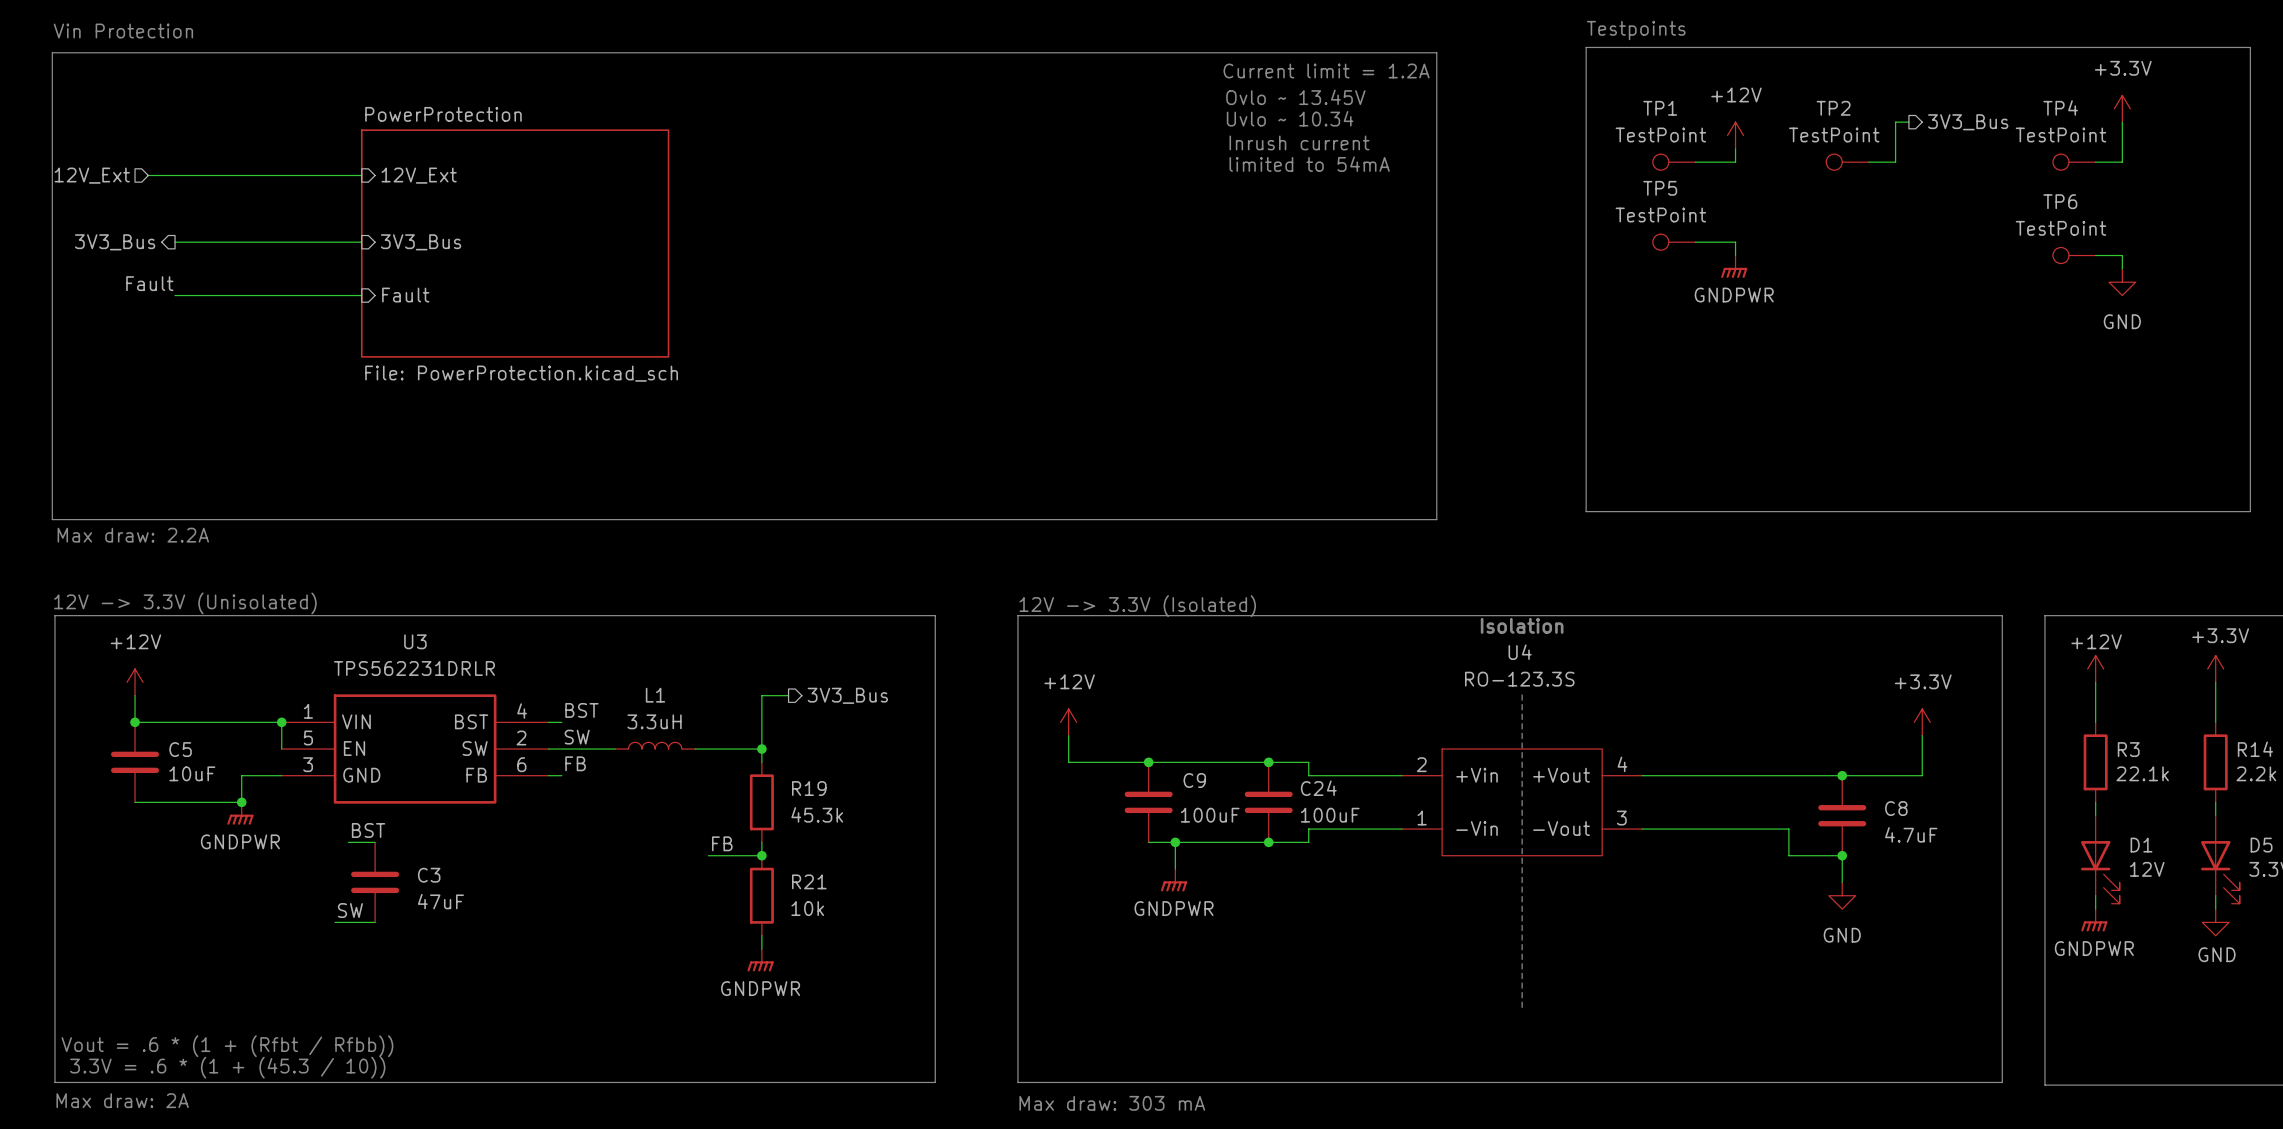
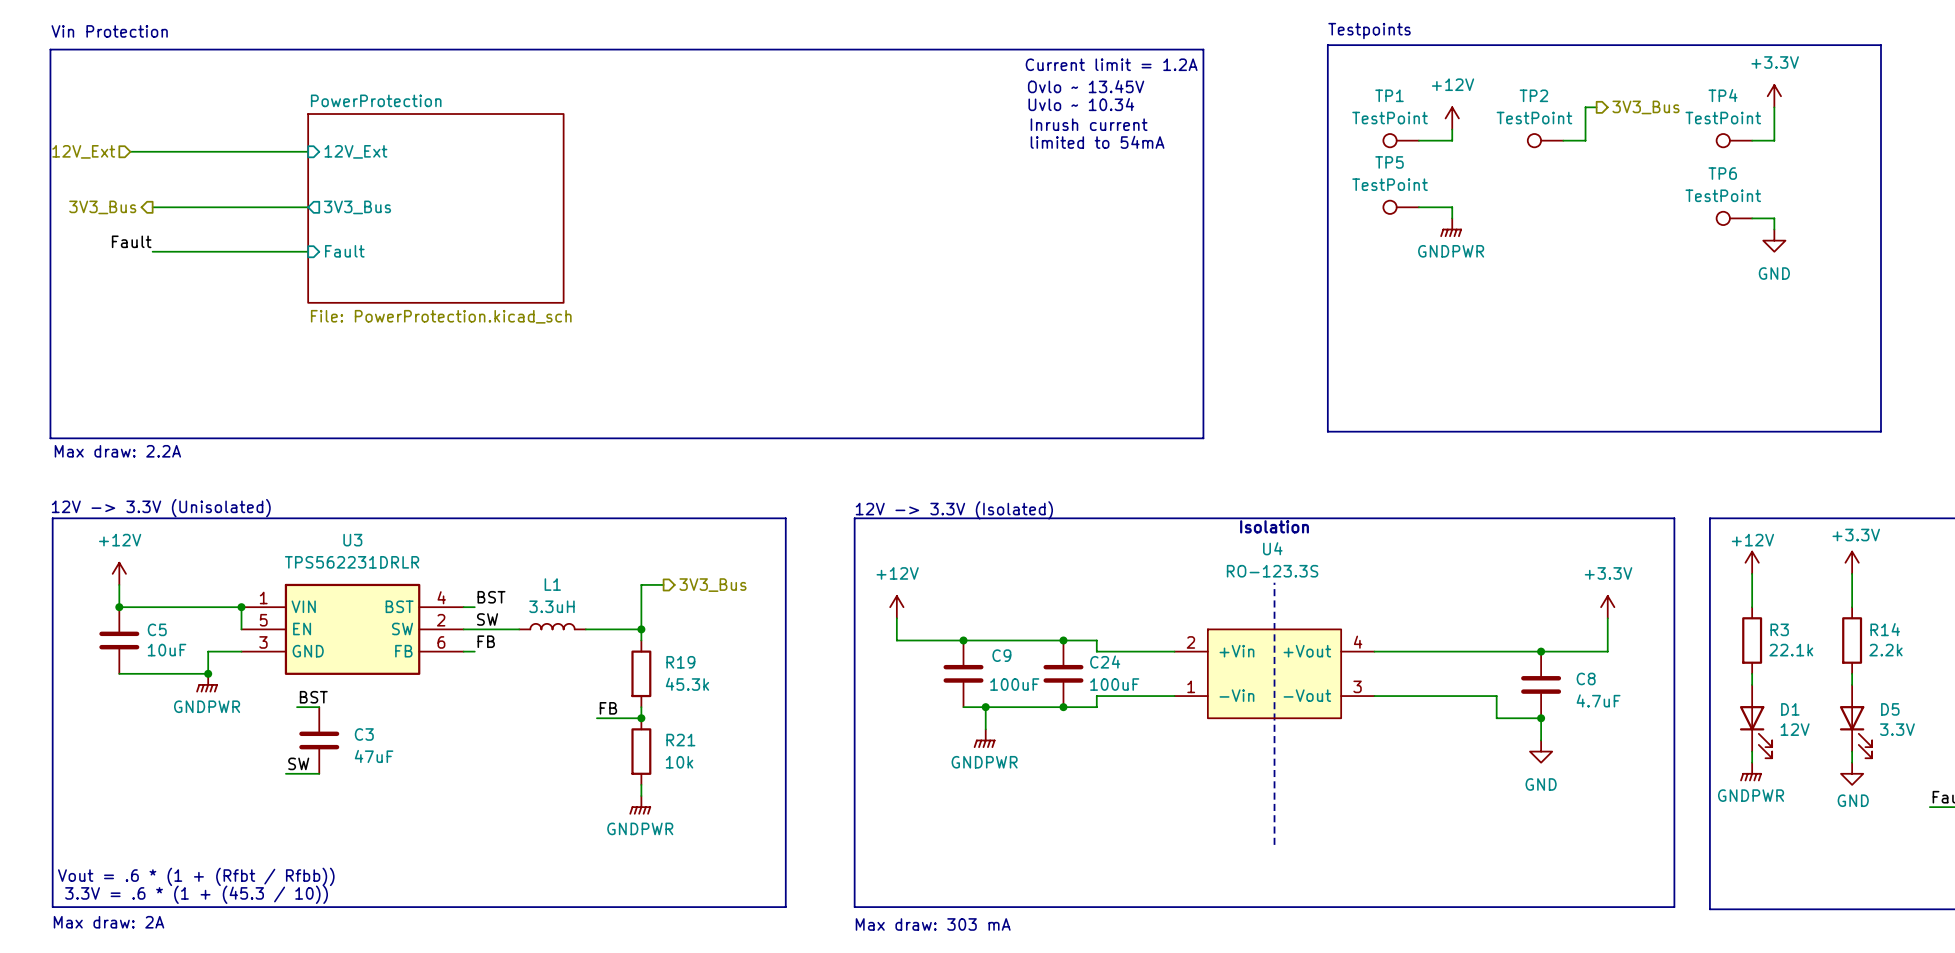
sheet pin shape: input (421, 242) -> output (357, 207)

